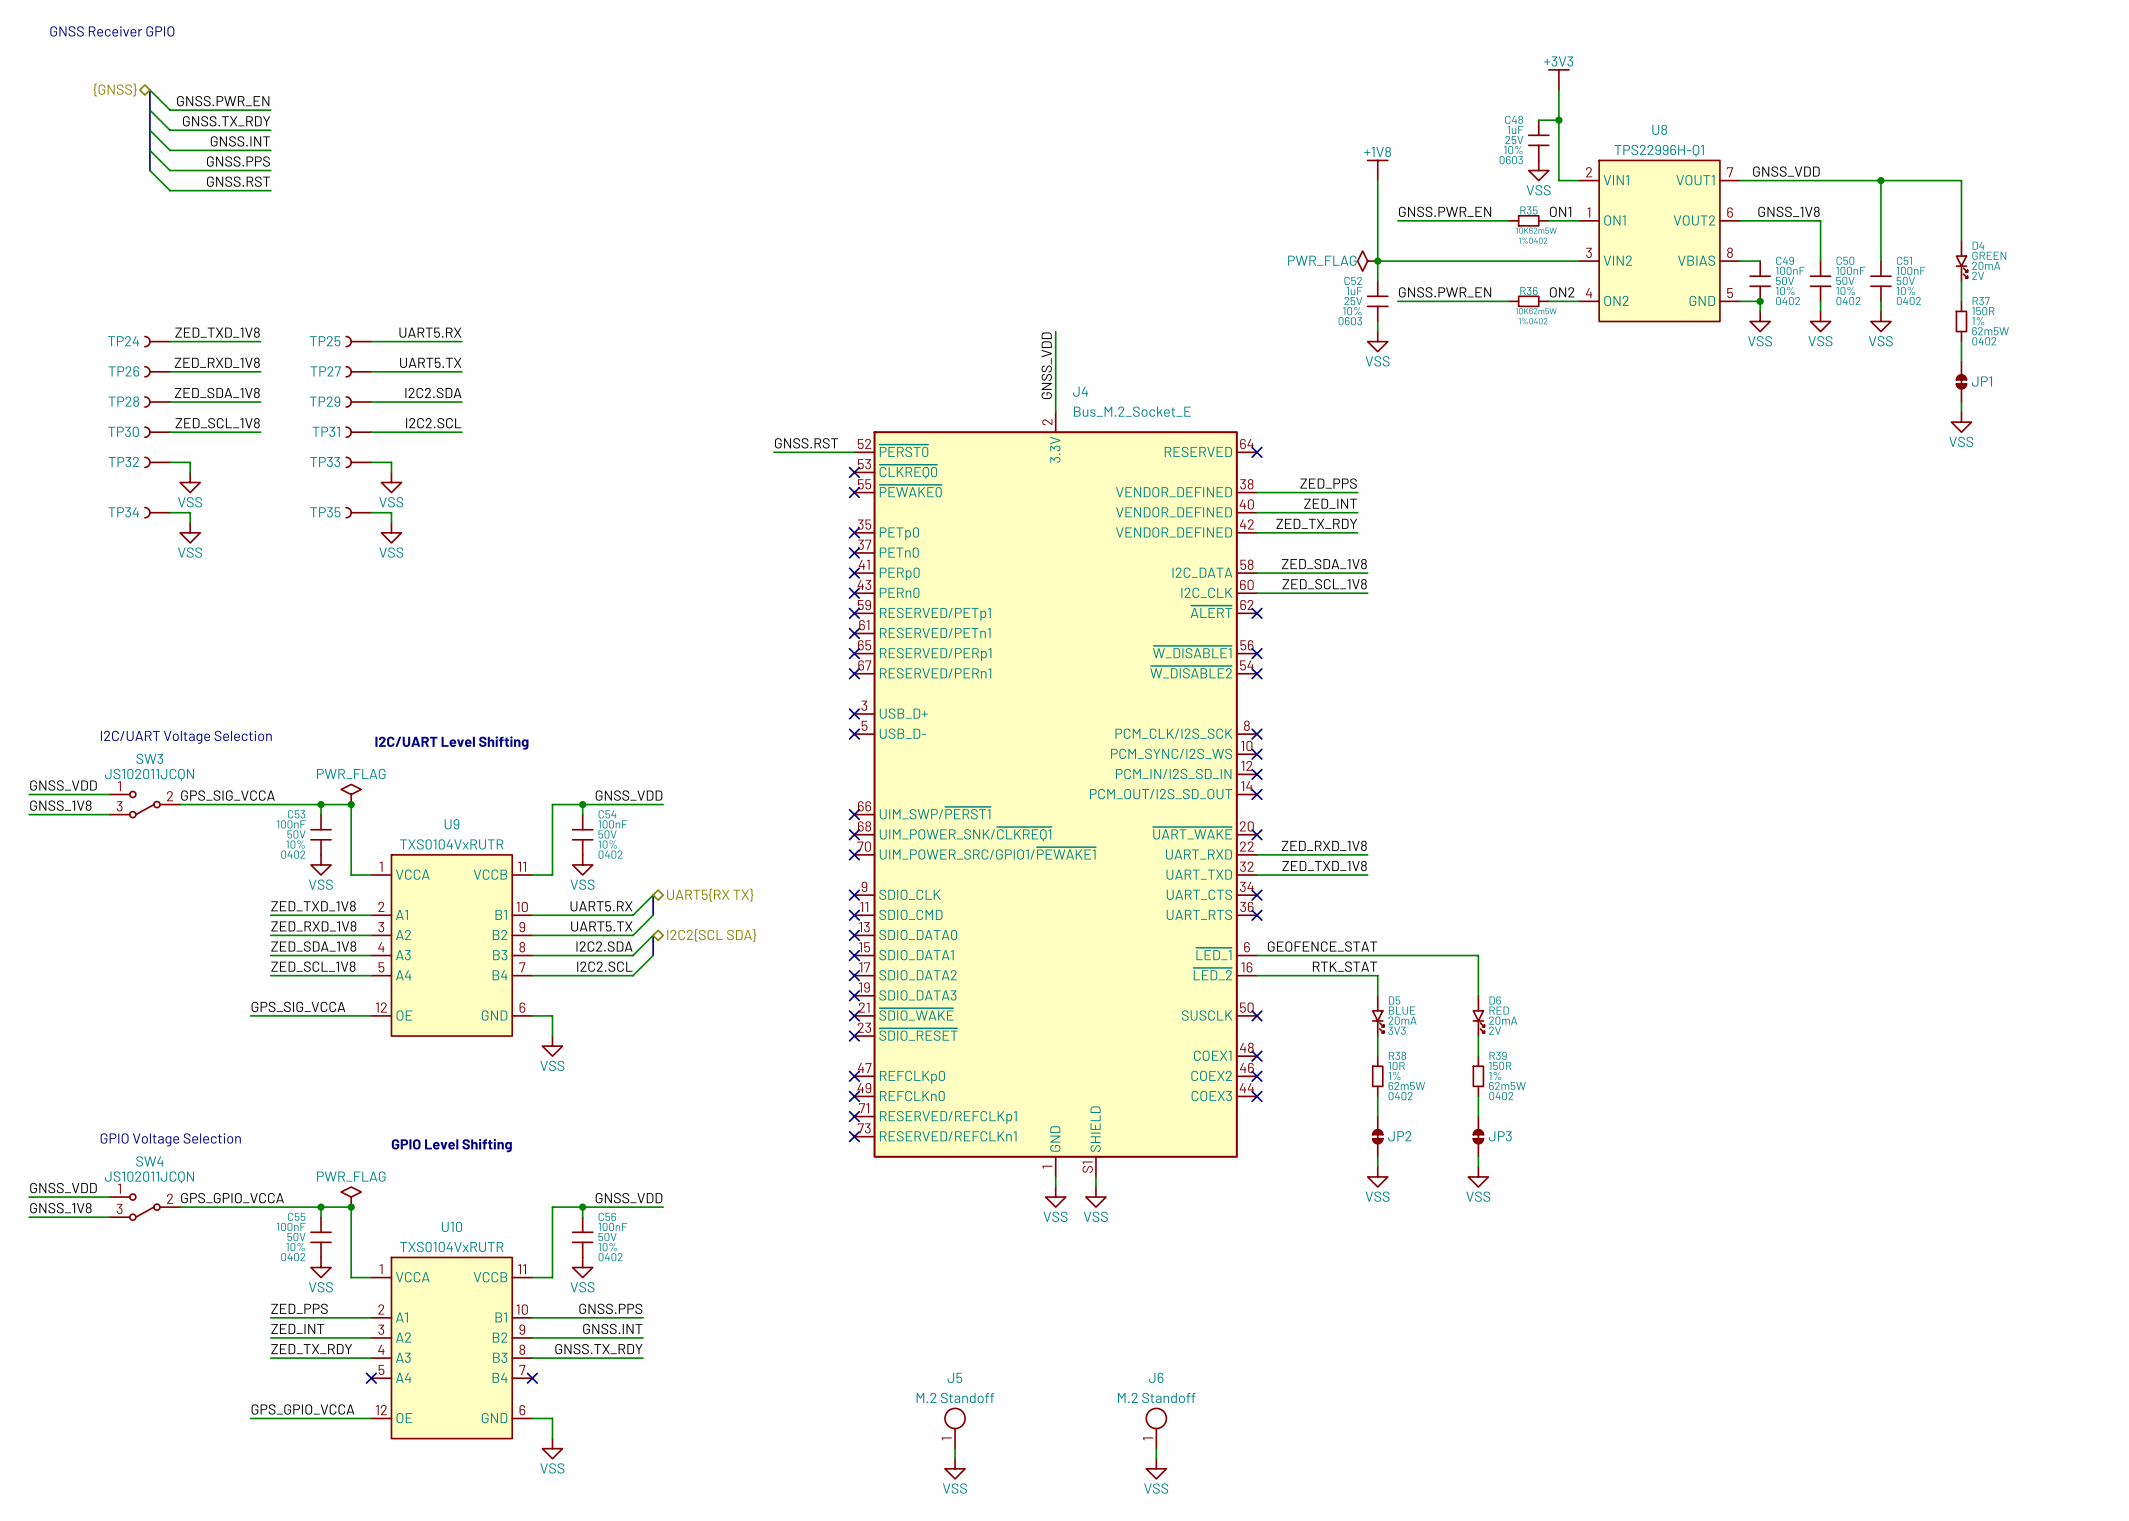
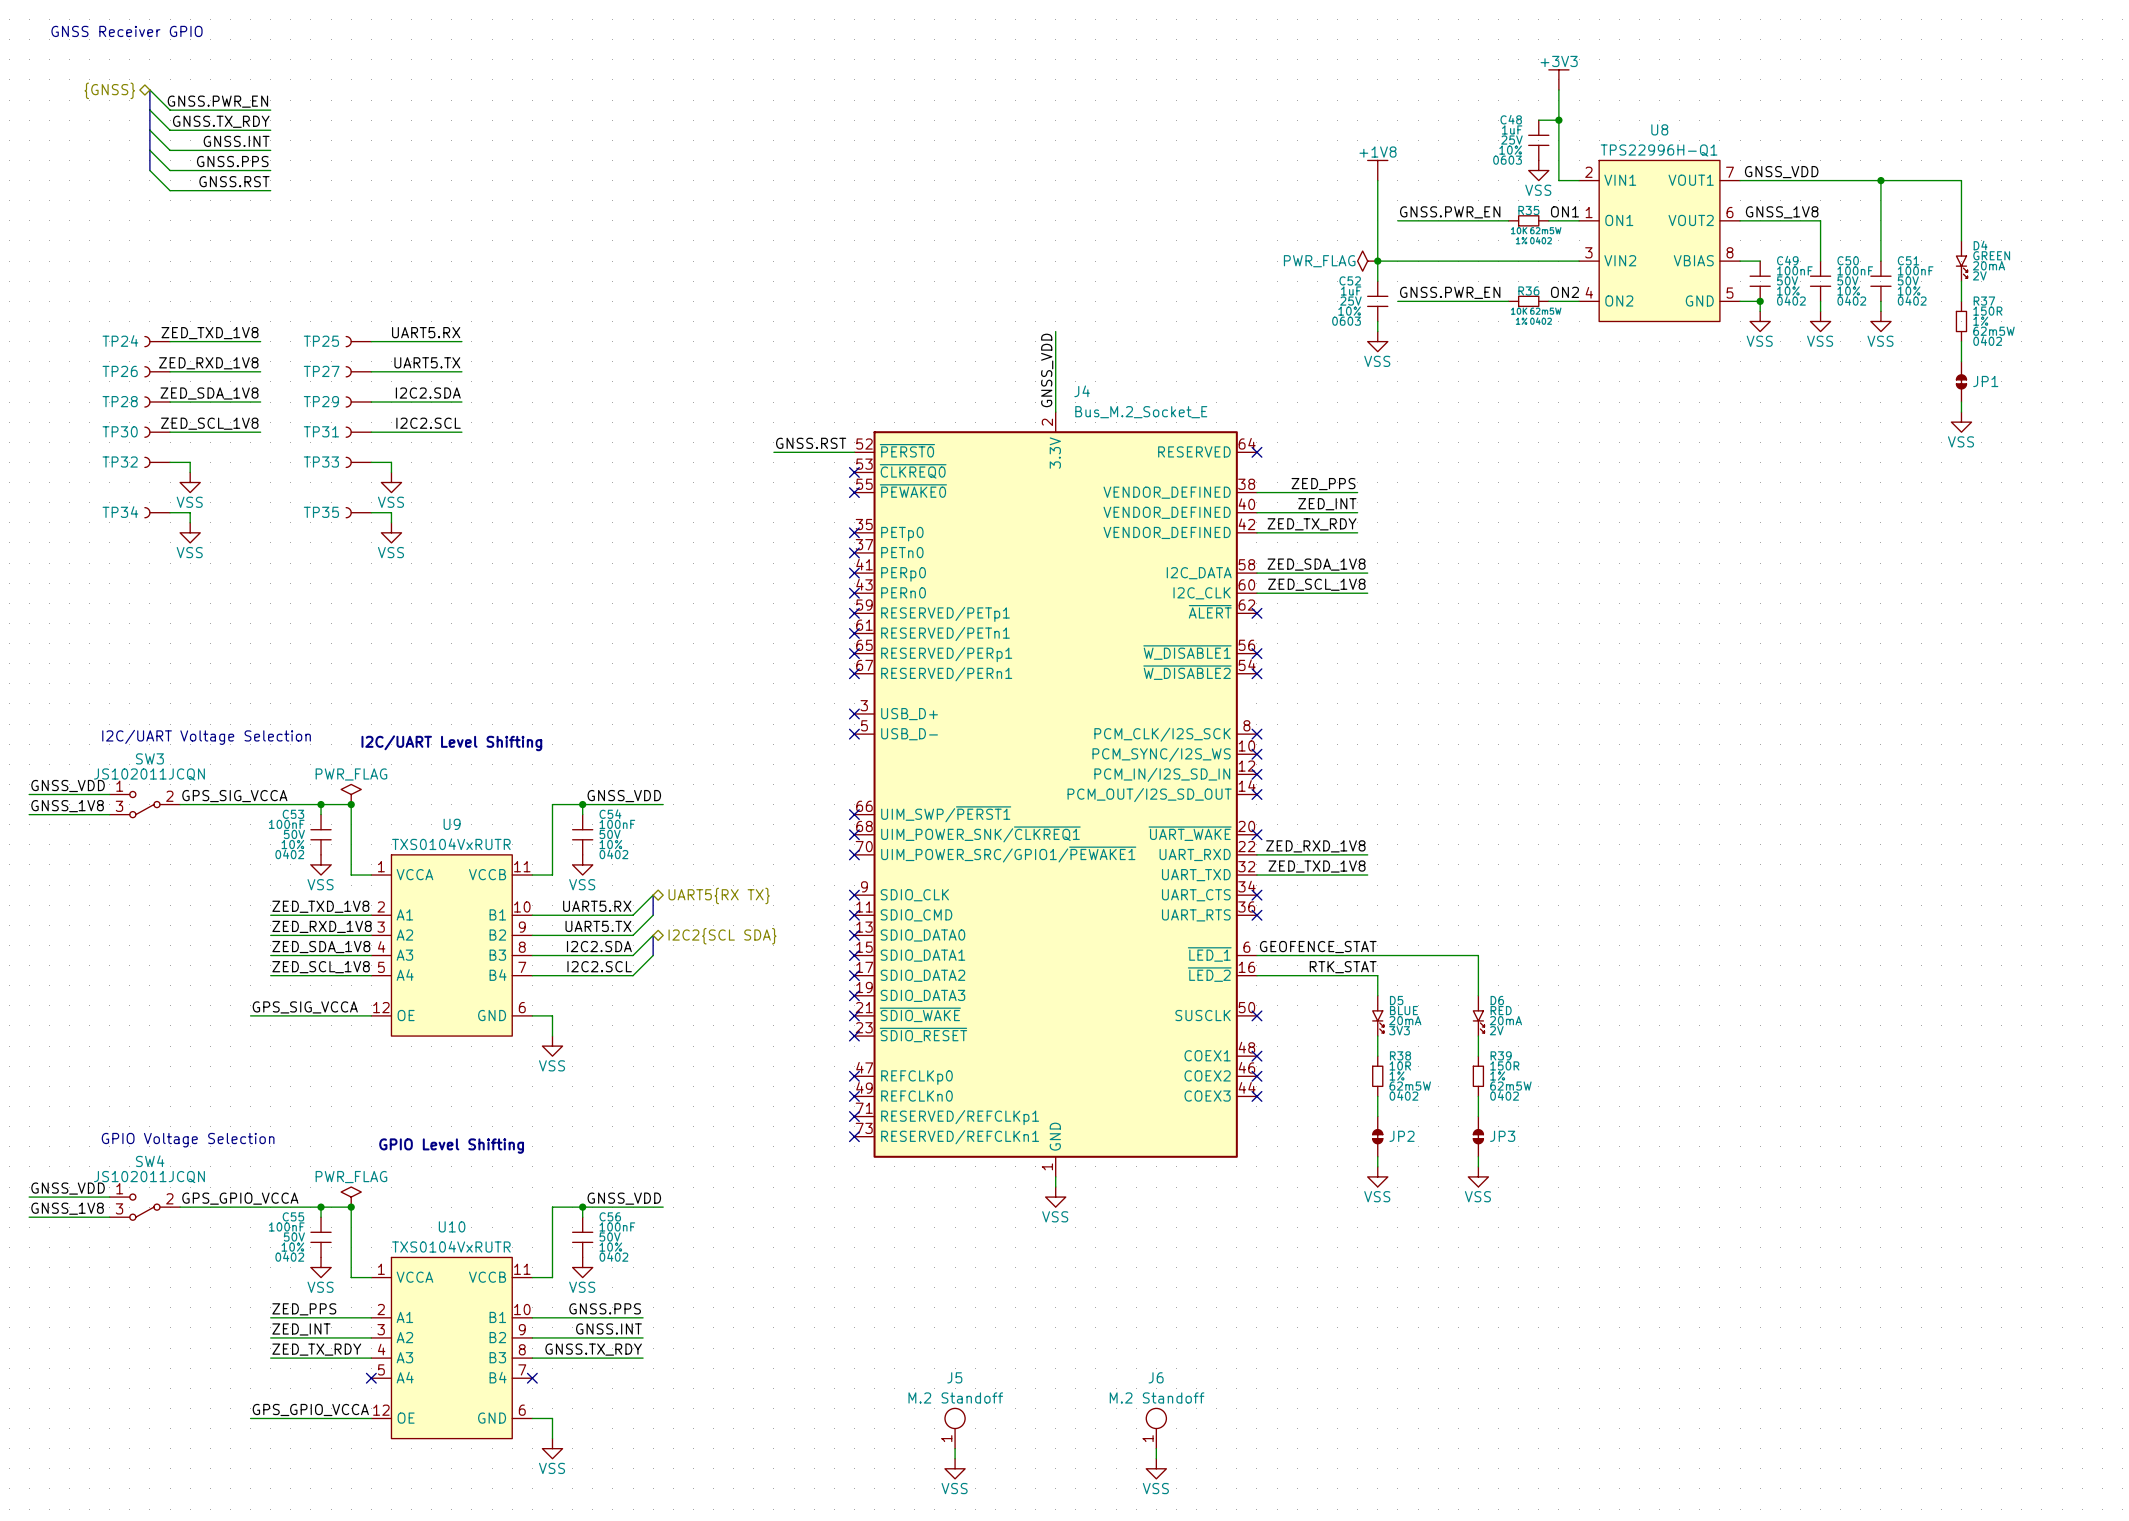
J4 symbol: [854, 412, 1257, 1177] -> [854, 412, 1257, 1177]
wire: (1095, 1176) (1095, 1187) -> none
power symbol: VSS (1095, 1197) -> none

